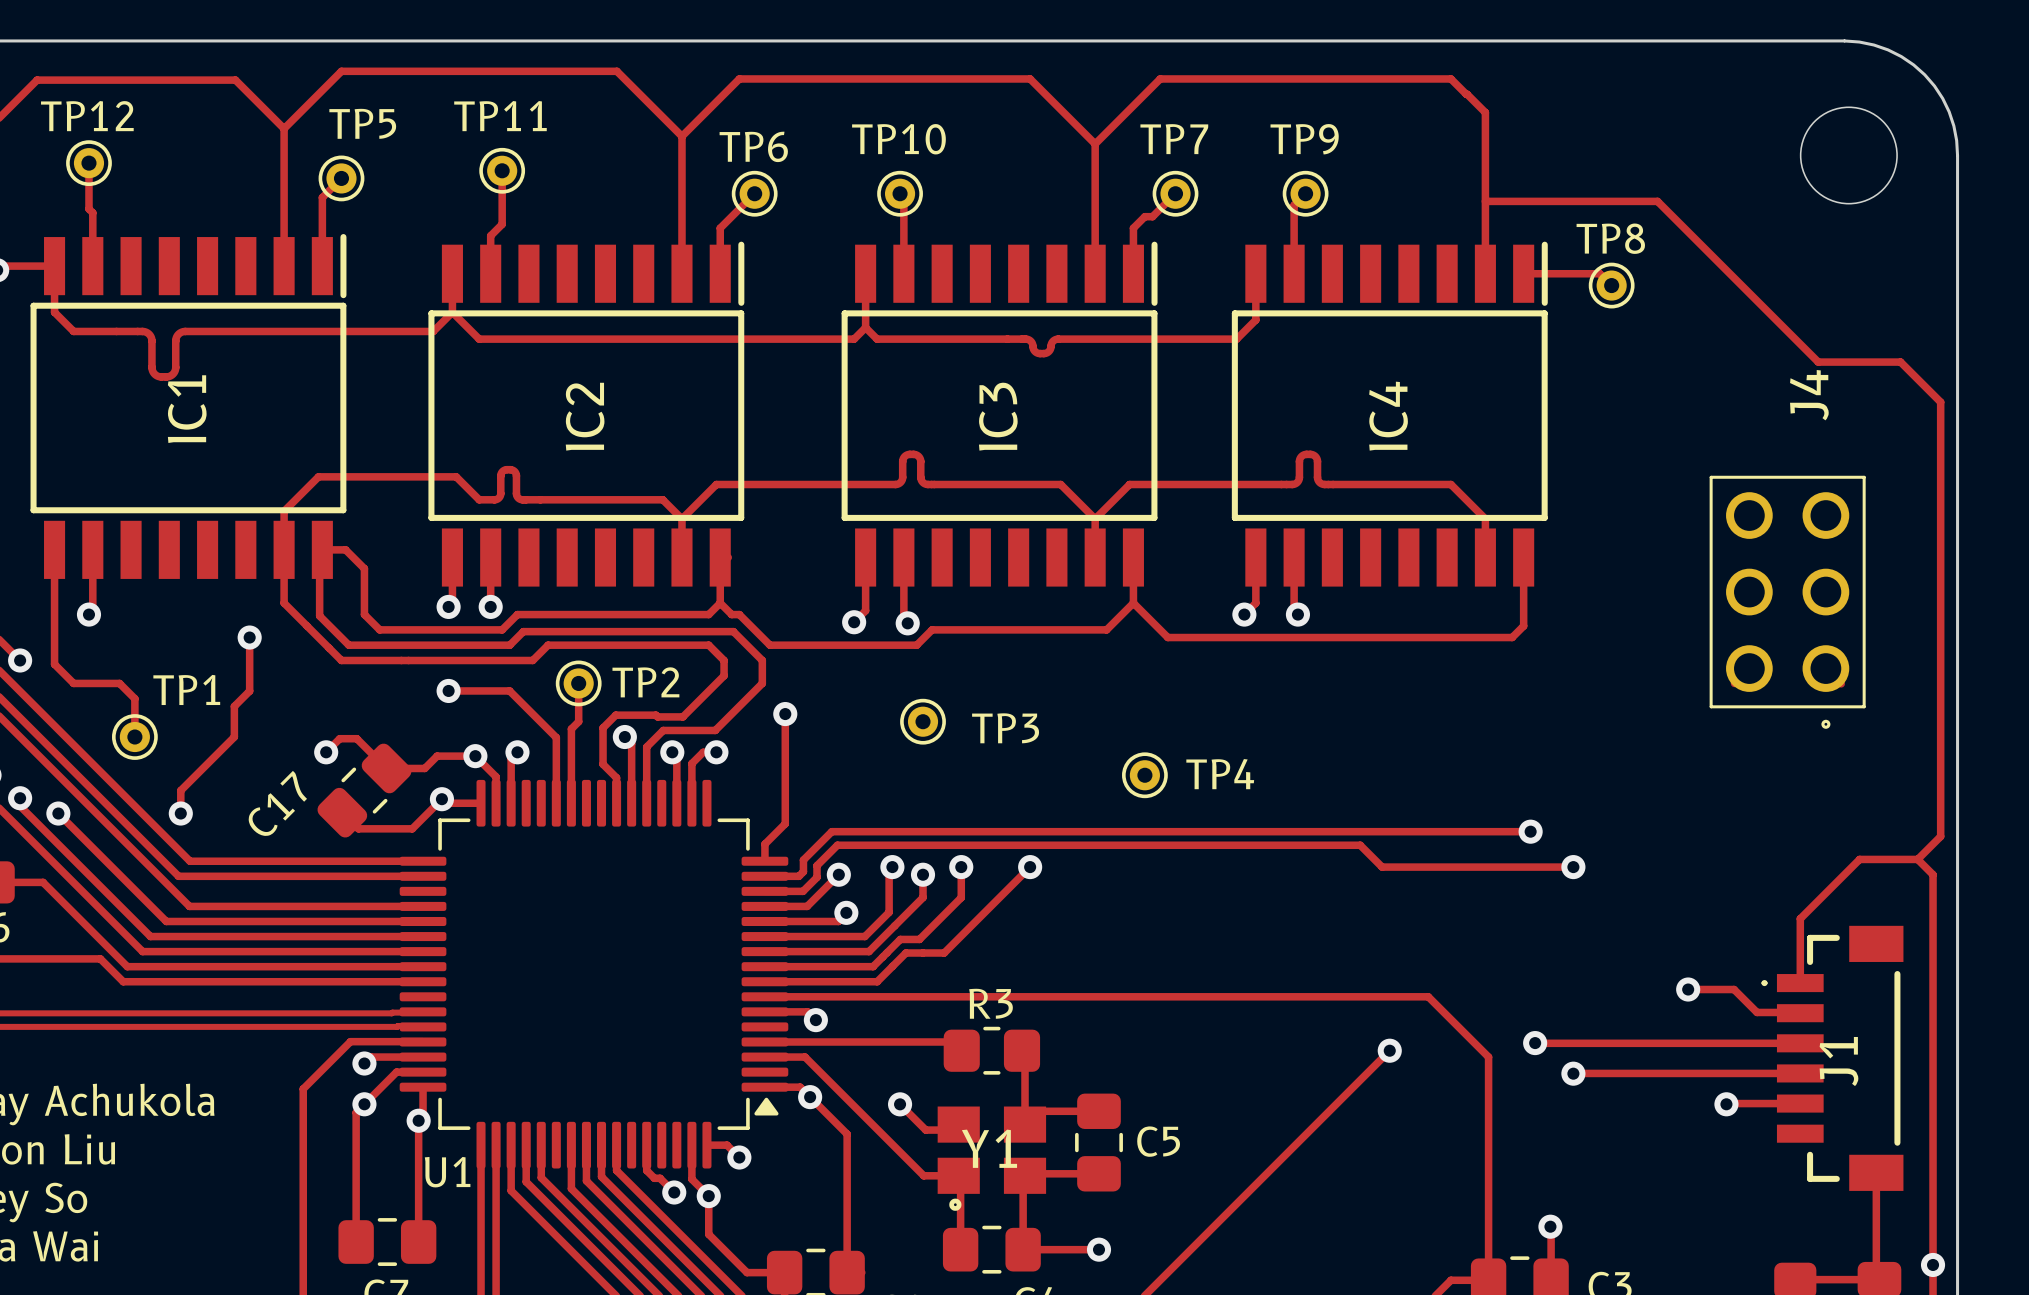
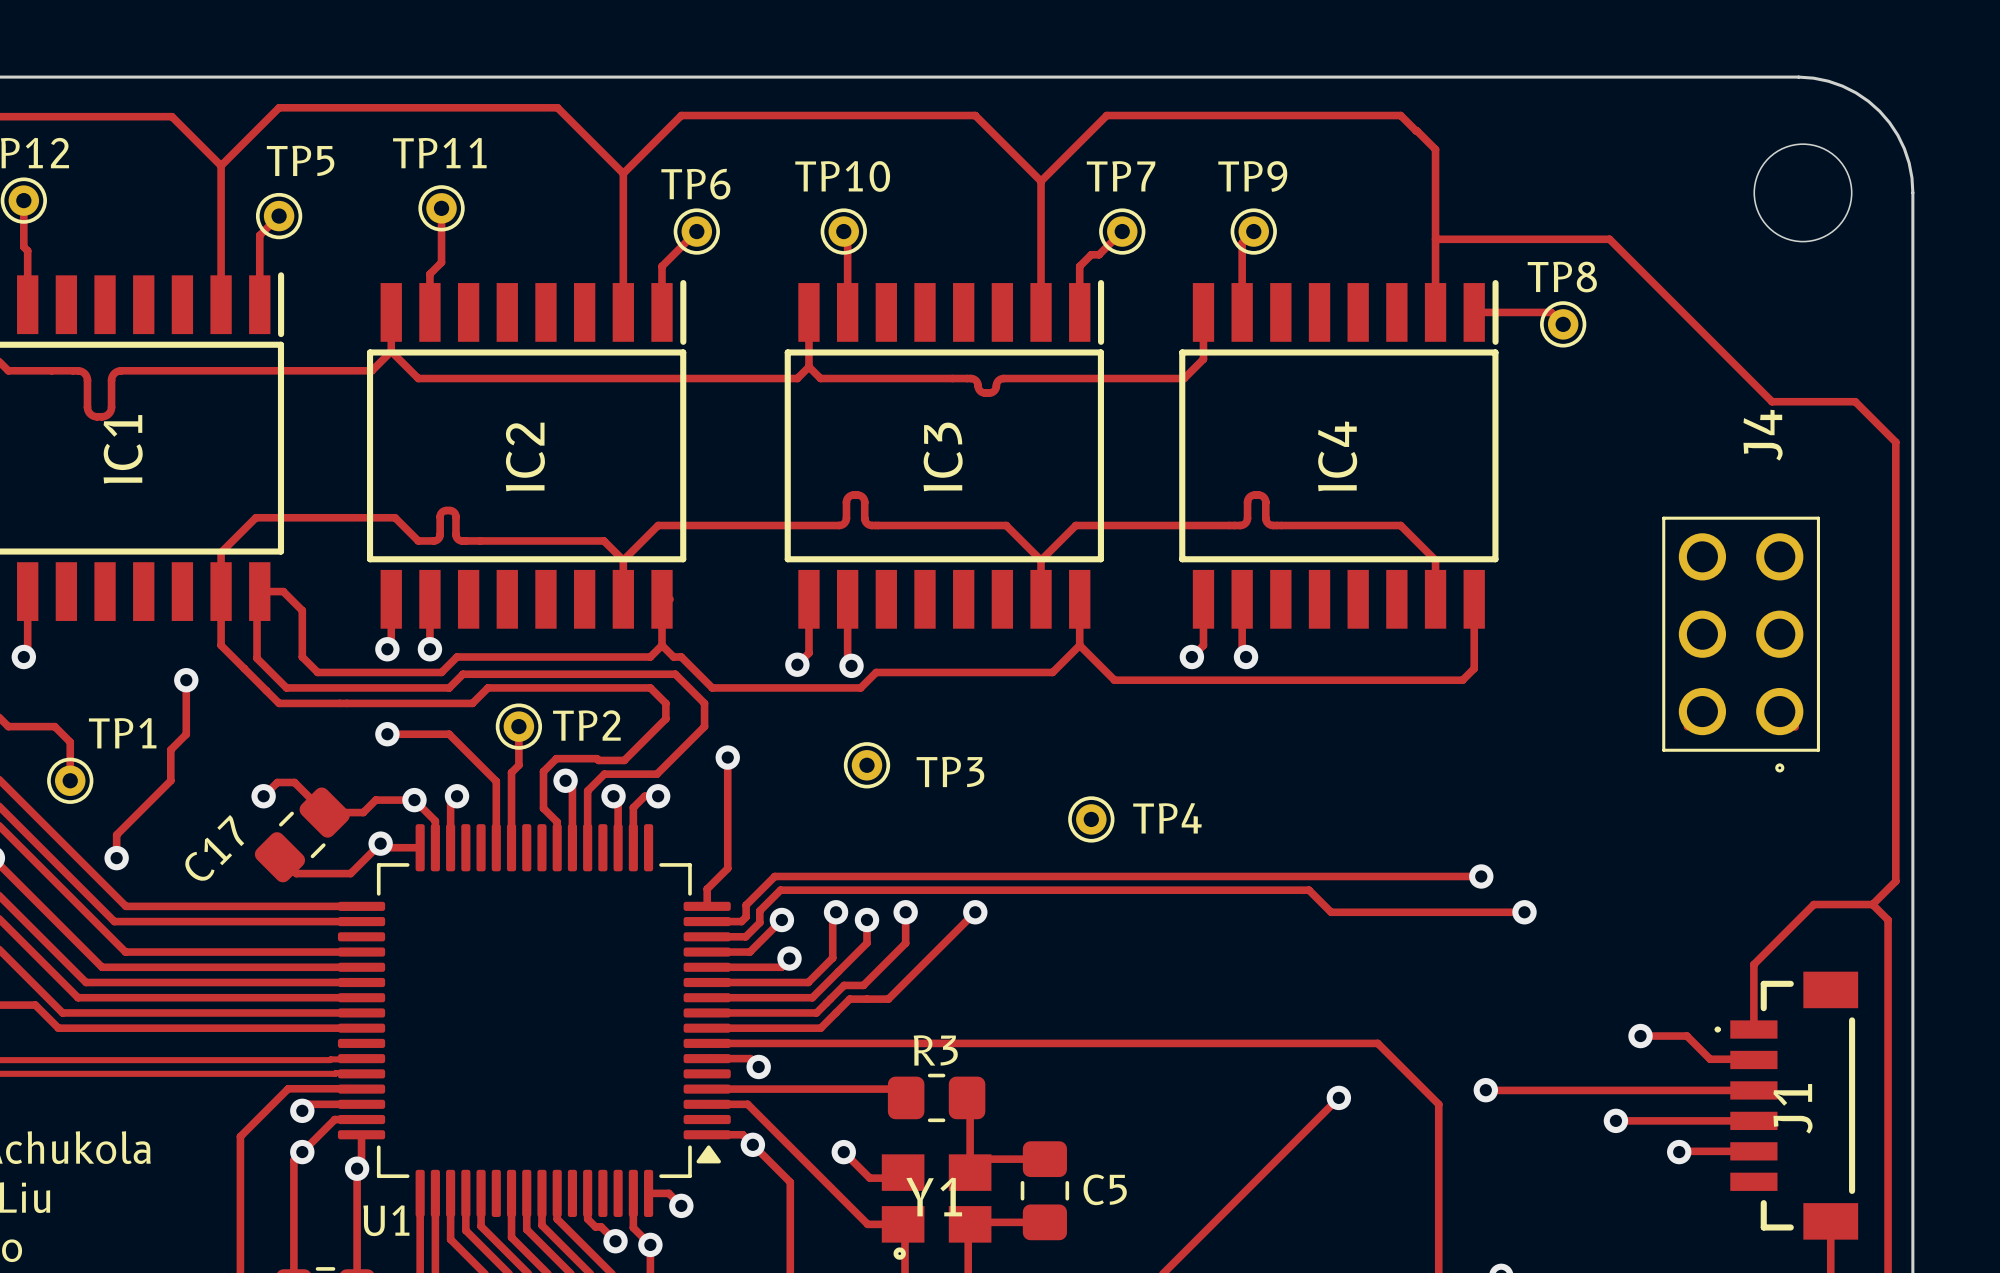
track: (1573, 1073) (1663, 1073) -> none
via position: (1573, 1073) -> (1615, 1120)

